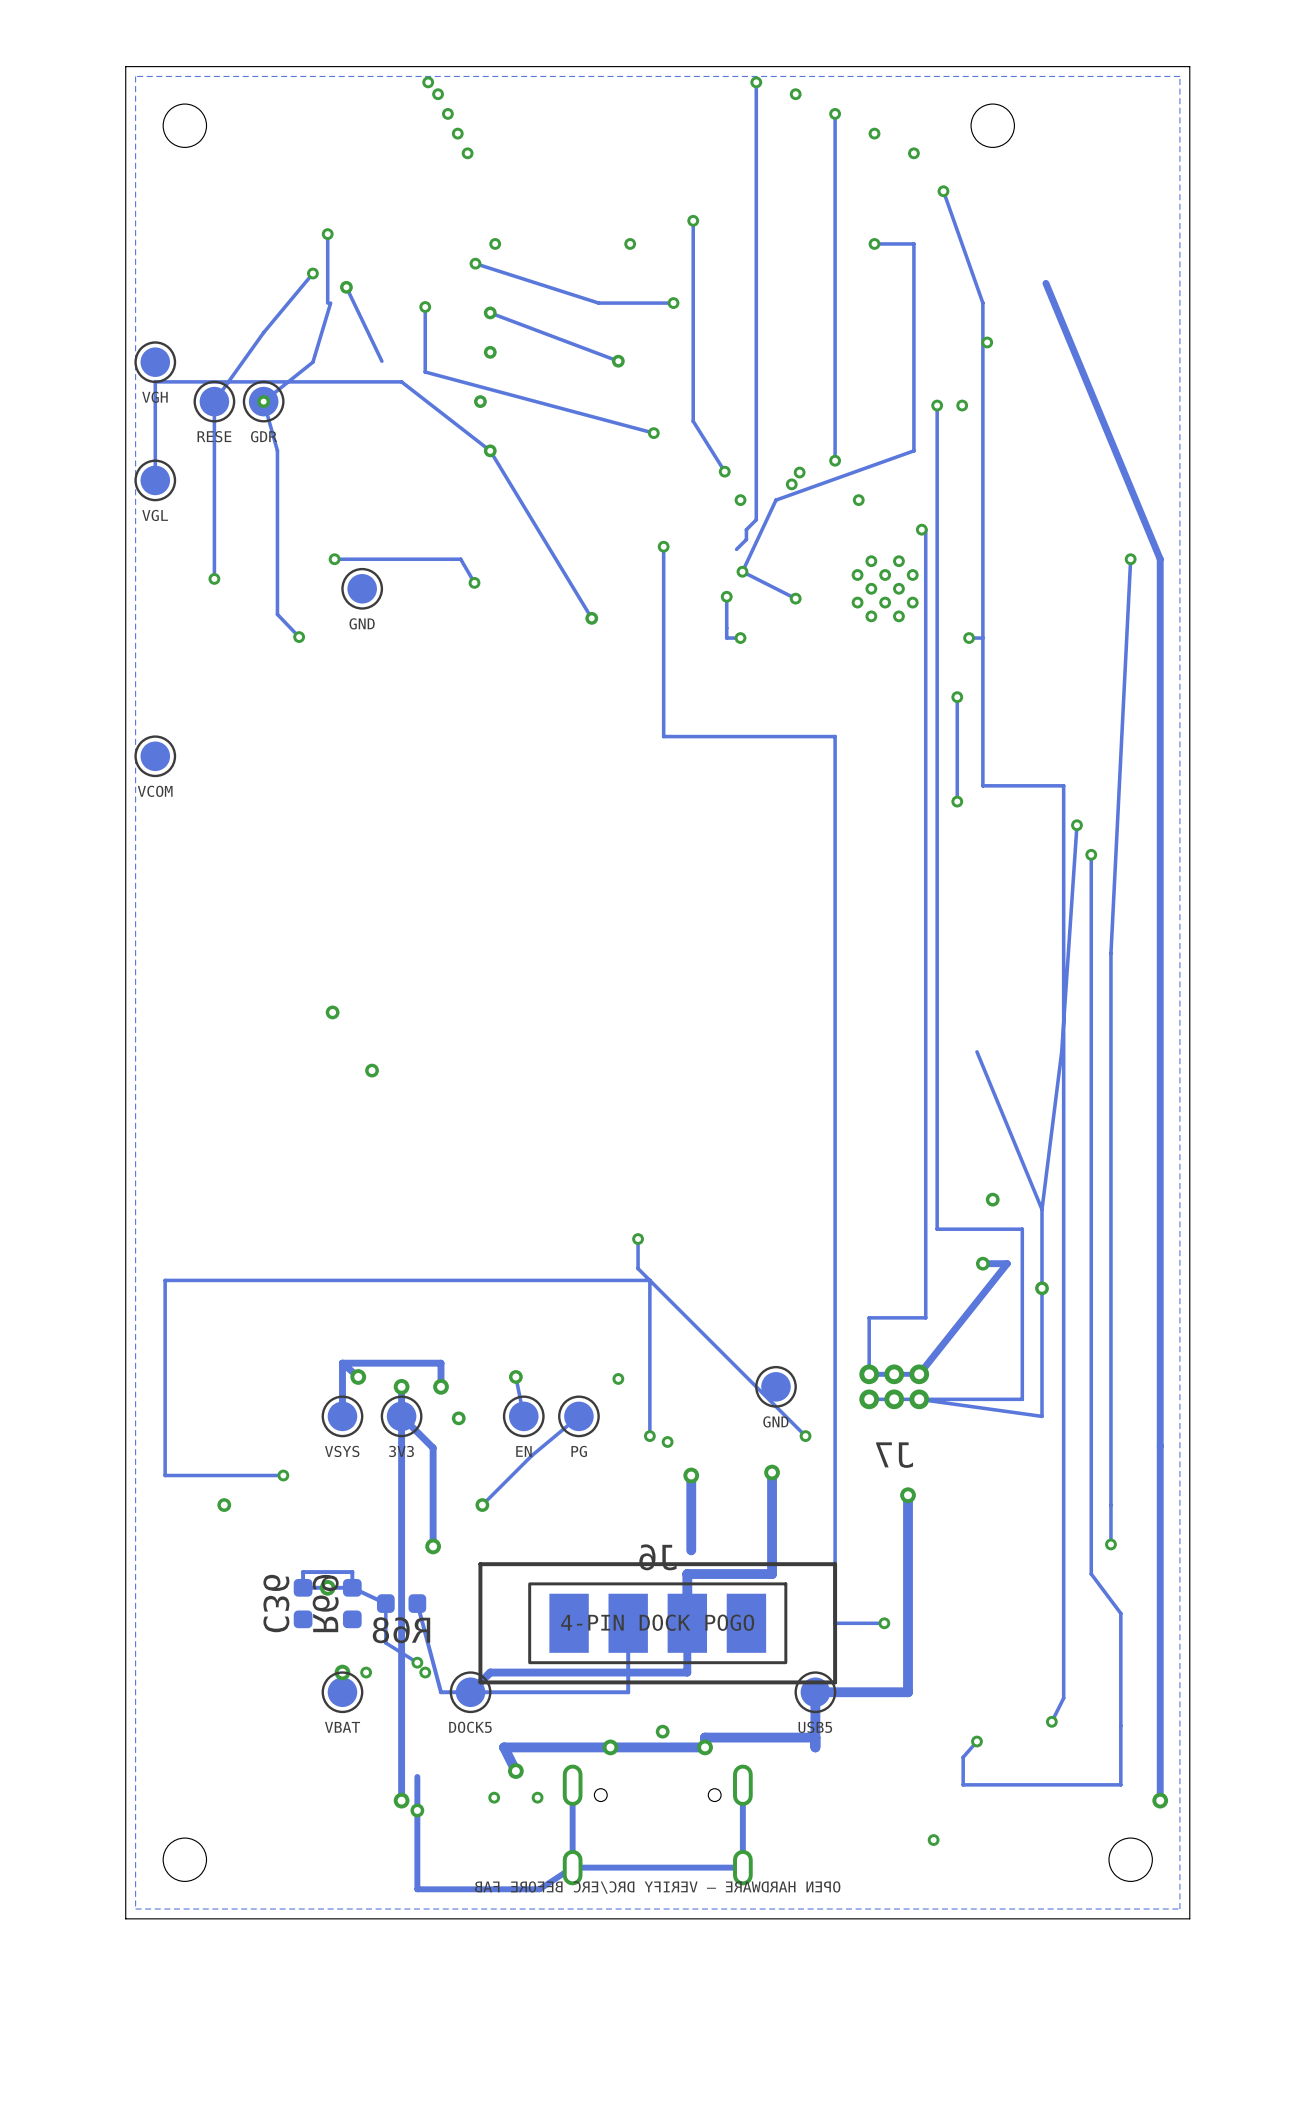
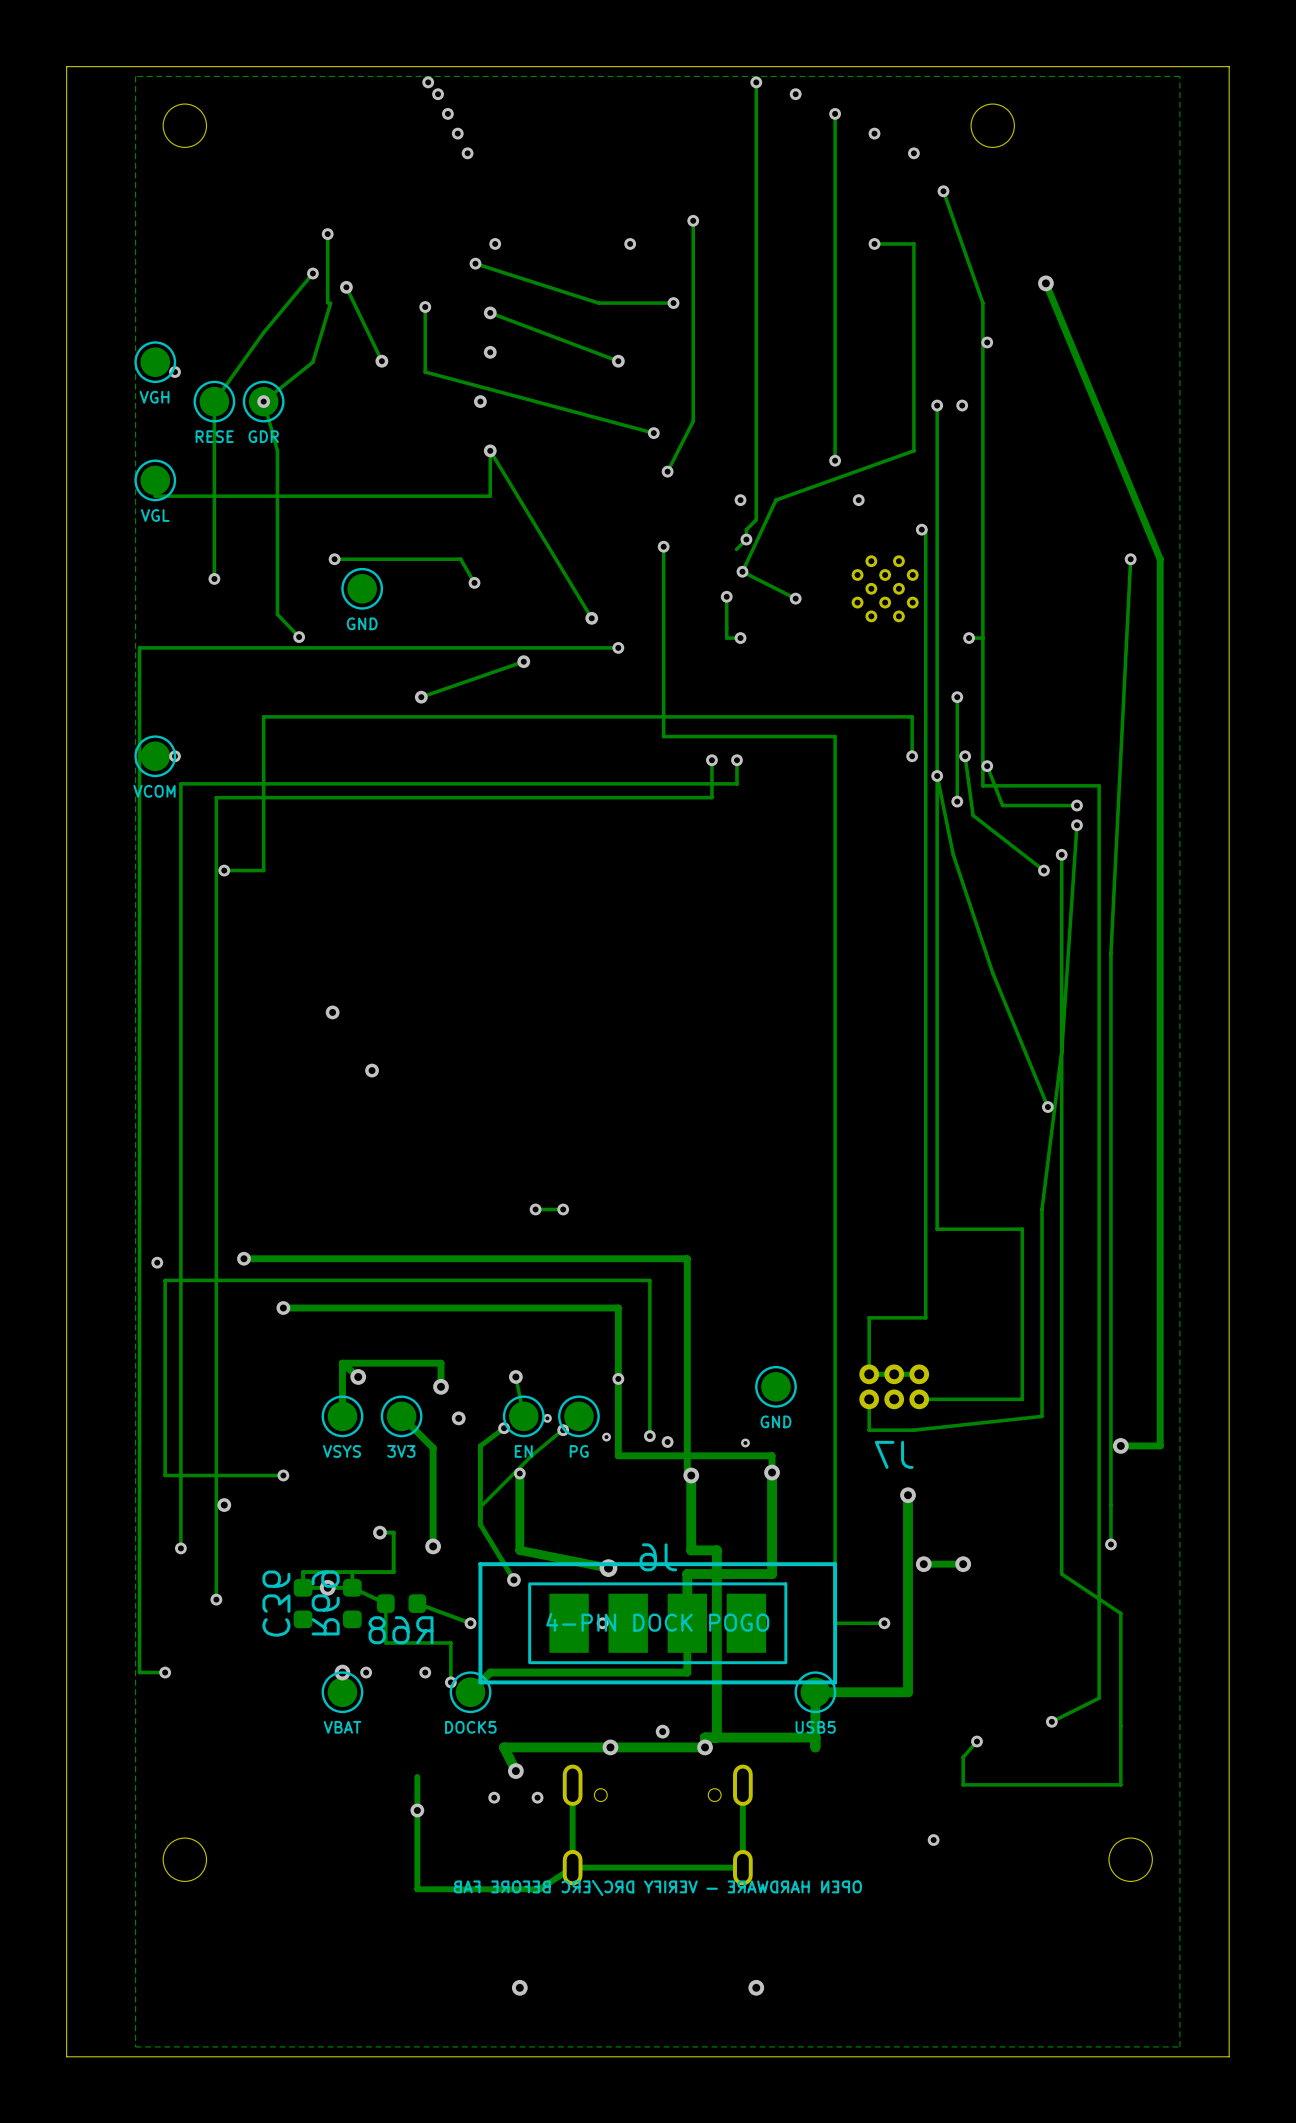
board edge: (1189, 66) (1189, 1918) (125, 1918) (125, 66) -> (1189, 66) (1229, 66) (1229, 2056) (66, 2056) (66, 66) (125, 66)
via: none -> (1045, 283)
via: none -> (381, 361)
via: none -> (174, 372)
track: (693, 421) (724, 471) -> (693, 421) (667, 471)
track: (490, 450) (401, 381) (155, 381) (155, 480) -> (490, 450) (490, 496) (155, 496) (155, 480)
via position: (724, 471) -> (667, 471)
via: (799, 472) -> none
via: (791, 484) -> none
via: none -> (746, 539)
track: none -> (618, 647) (139, 647) (139, 1672) (165, 1672)
via: none -> (618, 647)
track: none -> (523, 661) (421, 697)
via: none -> (523, 661)
via: none -> (421, 697)
via: none -> (174, 756)
track: none -> (912, 756) (912, 716) (263, 716) (263, 870) (224, 870)
via: none -> (912, 756)
track: none -> (965, 756) (973, 815) (1043, 870)
via: none -> (965, 756)
track: none -> (711, 760) (711, 797) (216, 797) (216, 1599)
via: none -> (711, 760)
track: none -> (736, 760) (736, 783) (180, 783) (180, 1548)
via: none -> (736, 760)
track: none -> (987, 766) (1002, 805) (1076, 805)
via: none -> (987, 766)
track: none -> (937, 775) (953, 854) (992, 973) (1047, 1107)
via: none -> (937, 775)
track: (1063, 785) (1063, 1698) (1051, 1721) -> (1063, 785) (1099, 785) (1099, 1698) (1051, 1721)
via: none -> (1076, 805)
via: none -> (1061, 854)
track: (1091, 854) (1091, 1574) (1120, 1613) -> (1061, 854) (1061, 1574) (1120, 1613)
via: (1091, 854) -> none
via: none -> (224, 870)
via: none -> (1043, 870)
track: (976, 1051) (1041, 1209) -> none
via: none -> (1047, 1107)
via: (992, 1199) -> none
via: none -> (535, 1209)
track: none -> (563, 1209) (535, 1209)
via: none -> (563, 1209)
track: (638, 1239) (638, 1268) (805, 1436) -> none
via: (638, 1239) -> none
track: none -> (243, 1258) (687, 1258) (687, 1475) (691, 1475)
via: none -> (243, 1258)
via: none -> (157, 1262)
track: (982, 1263) (1007, 1263) (919, 1374) -> none
via: (982, 1263) -> none
via: (1041, 1288) -> none
track: none -> (283, 1308) (618, 1308) (618, 1455) (772, 1455) (772, 1472)
via: none -> (283, 1308)
track: (401, 1386) (401, 1800) -> none
via: (401, 1386) -> none
track: (869, 1399) (919, 1399) (1041, 1416) -> (869, 1399) (869, 1430) (913, 1430) (1041, 1416)
via: none -> (547, 1418)
track: none -> (504, 1428) (480, 1445) (480, 1524) (513, 1579)
via: none -> (504, 1428)
via: none -> (563, 1430)
via: (805, 1436) -> none
via: none -> (606, 1437)
via: none -> (745, 1442)
via: none -> (1120, 1445)
track: (1160, 1445) (1160, 1800) -> (1160, 1445) (1120, 1445)
track: none -> (519, 1473) (519, 1550) (608, 1568)
via: none -> (519, 1473)
via: (482, 1505) -> none
track: none -> (379, 1532) (393, 1532) (393, 1572) (352, 1572)
via: none -> (379, 1532)
via: none -> (180, 1548)
track: none -> (691, 1550) (716, 1550) (716, 1737)
via: none -> (923, 1564)
track: none -> (963, 1564) (923, 1564)
via: none -> (963, 1564)
via: none -> (608, 1568)
via: none -> (513, 1579)
via: none -> (216, 1599)
track: (417, 1603) (441, 1692) (628, 1692) (628, 1623) -> (417, 1603) (470, 1623)
via: none -> (470, 1623)
via: none -> (602, 1623)
track: (385, 1642) (417, 1662) -> (385, 1642) (450, 1642) (450, 1682)
via: (417, 1662) -> none
via: none -> (165, 1672)
via: none -> (450, 1682)
via: (401, 1800) -> none
via: (1160, 1800) -> none
zone outline: (1179, 1909) (135, 1909) -> (1179, 1909) (1179, 2046) (135, 2046) (135, 1909)
via: none -> (519, 1987)
via: none -> (756, 1987)

